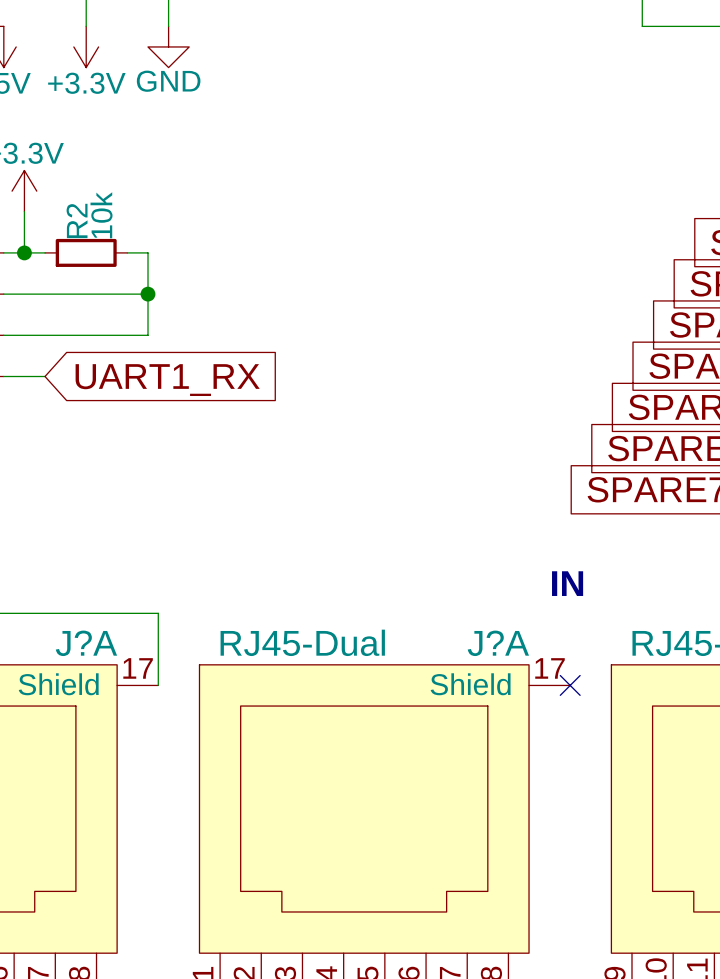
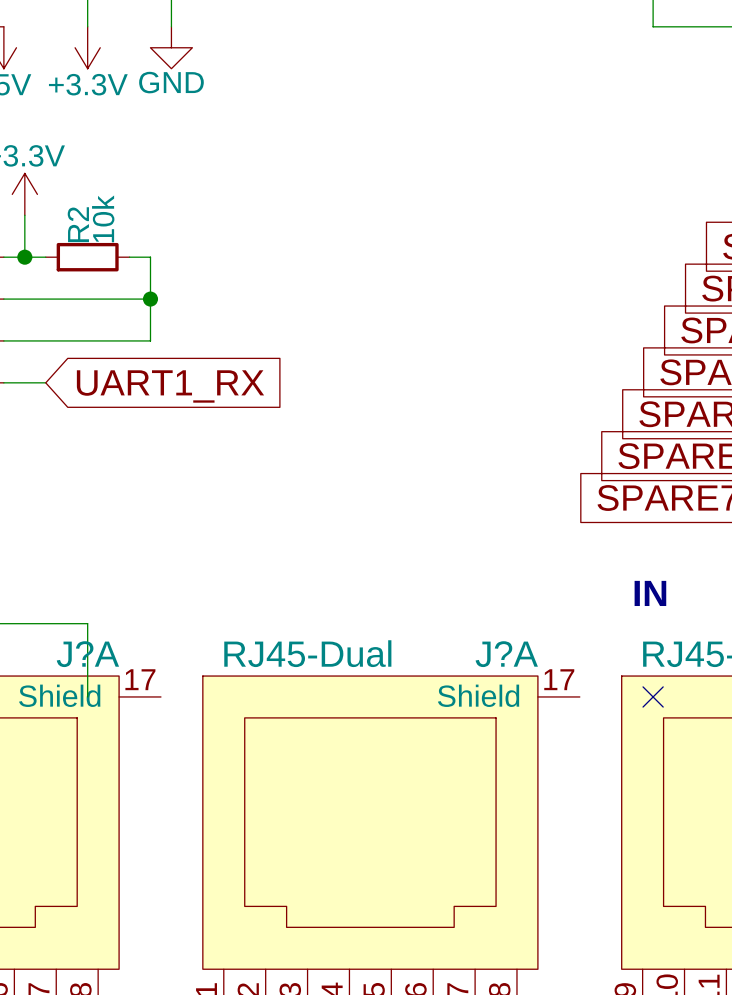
text position: IN (567, 583) -> IN (650, 593)
wire: (86, 613) (158, 613) (158, 685) -> (87, 623) (87, 696)
no-connect mark position: (570, 685) -> (653, 696)

